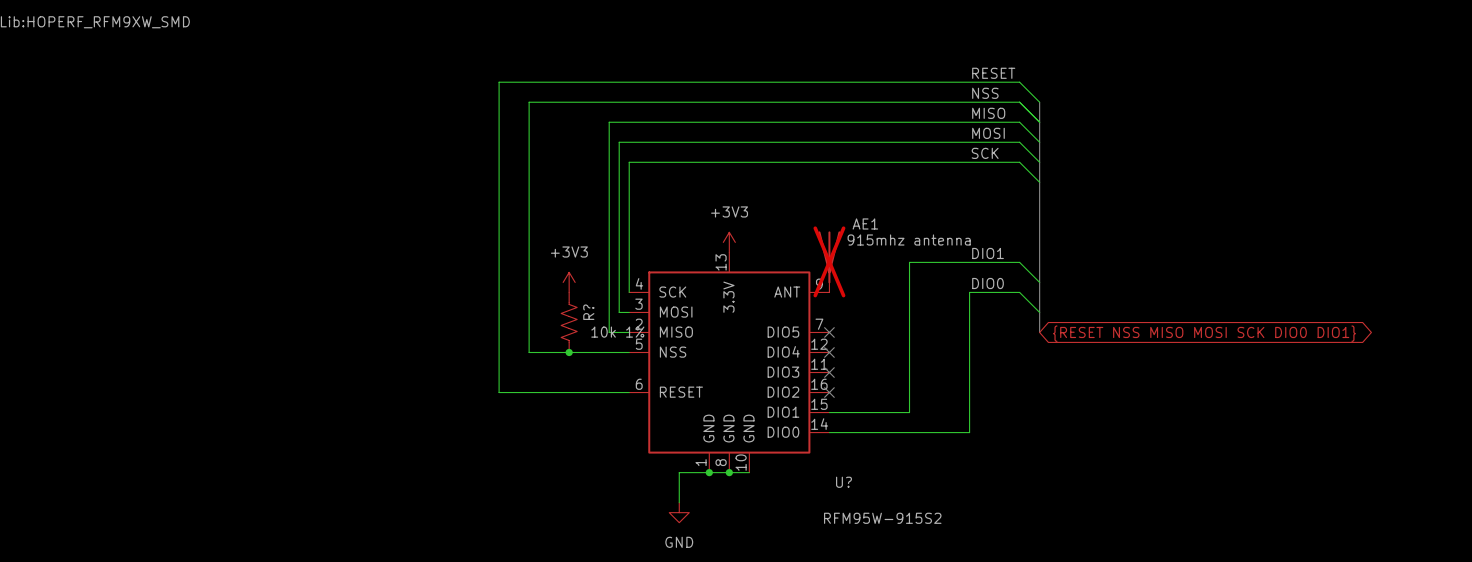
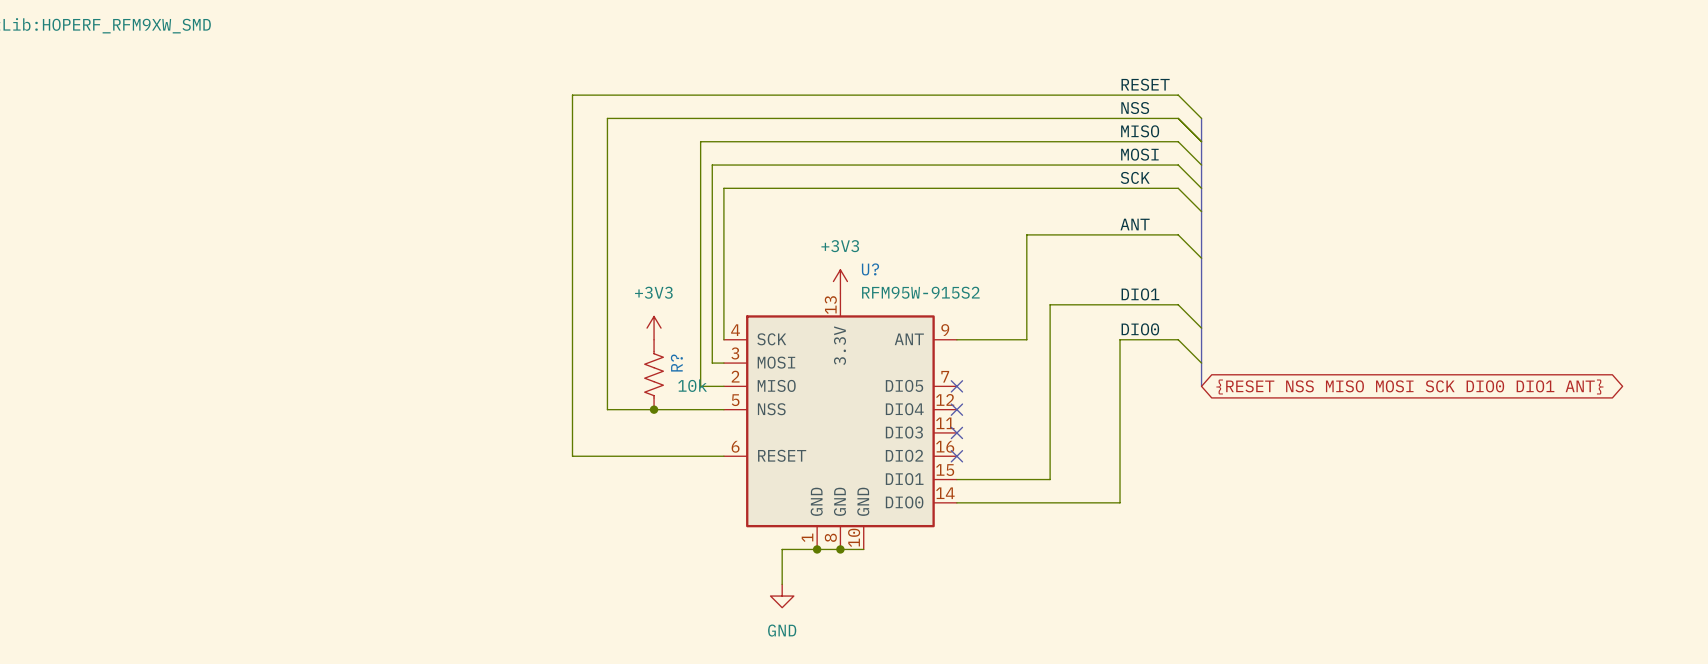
label: none -> ANT (1135, 224)
wire: none -> (1201, 258) (1178, 234) (1026, 234) (1026, 339) (956, 339)
AE1: 915mhz antenna (829, 261) -> none
R? value: 10k 1% (617, 332) -> 10k (692, 385)
global label: {RESET NSS MISO MOSI SCK DIO0 DIO1} (1204, 333) -> {RESET NSS MISO MOSI SCK DIO0 DIO1 ANT} (1409, 386)
U? name position: U? (843, 482) -> U? (870, 269)
U? value position: RFM95W-915S2 (882, 518) -> RFM95W-915S2 (920, 292)

